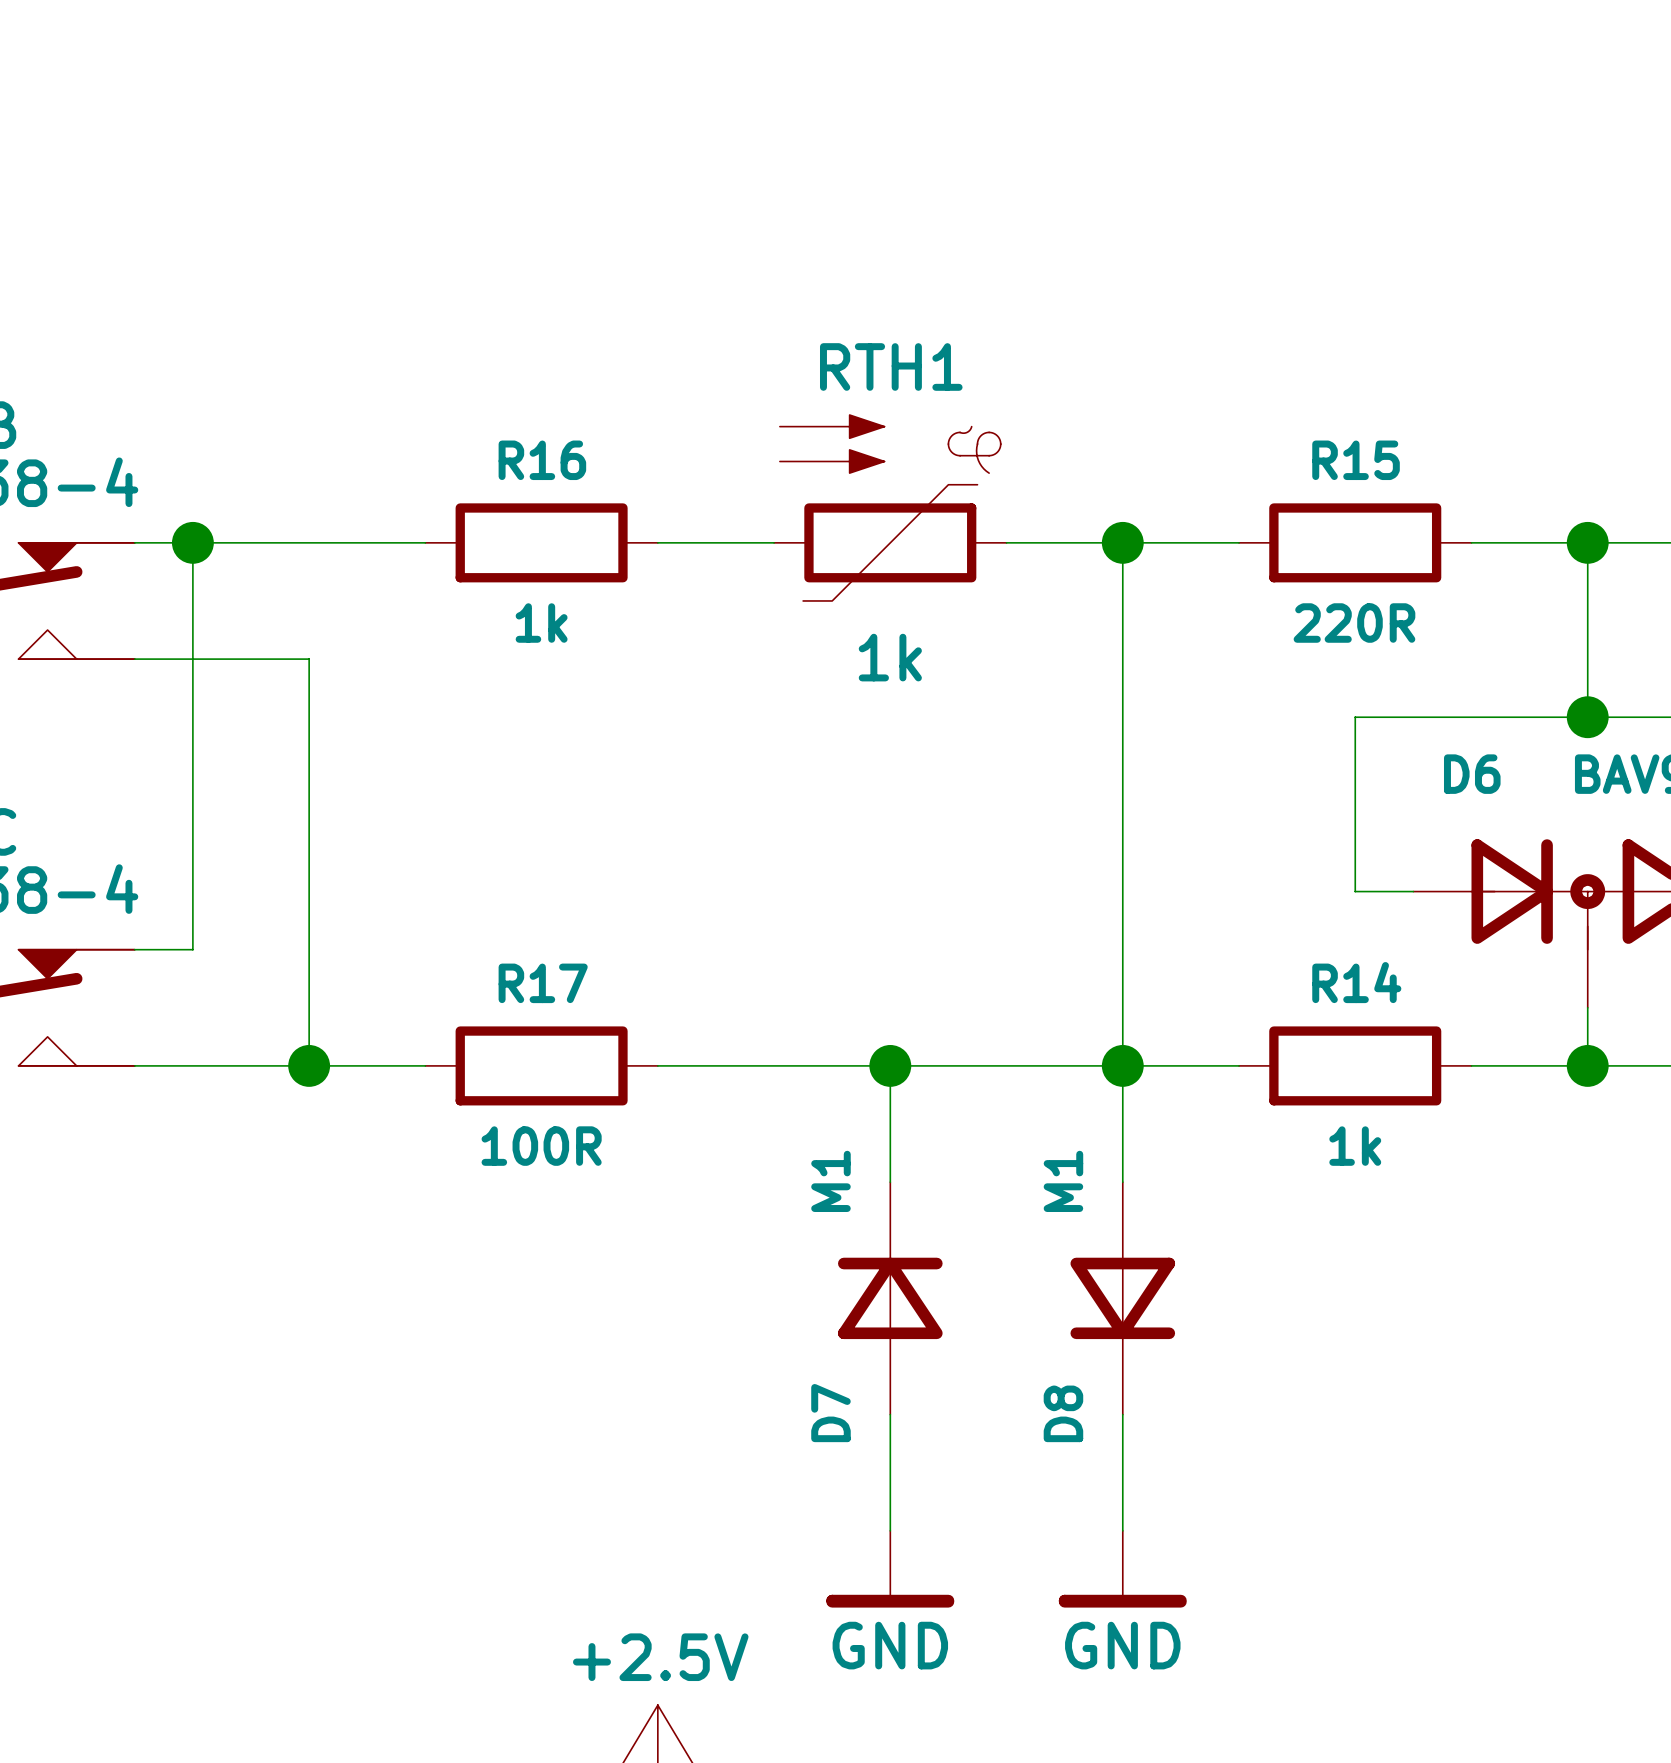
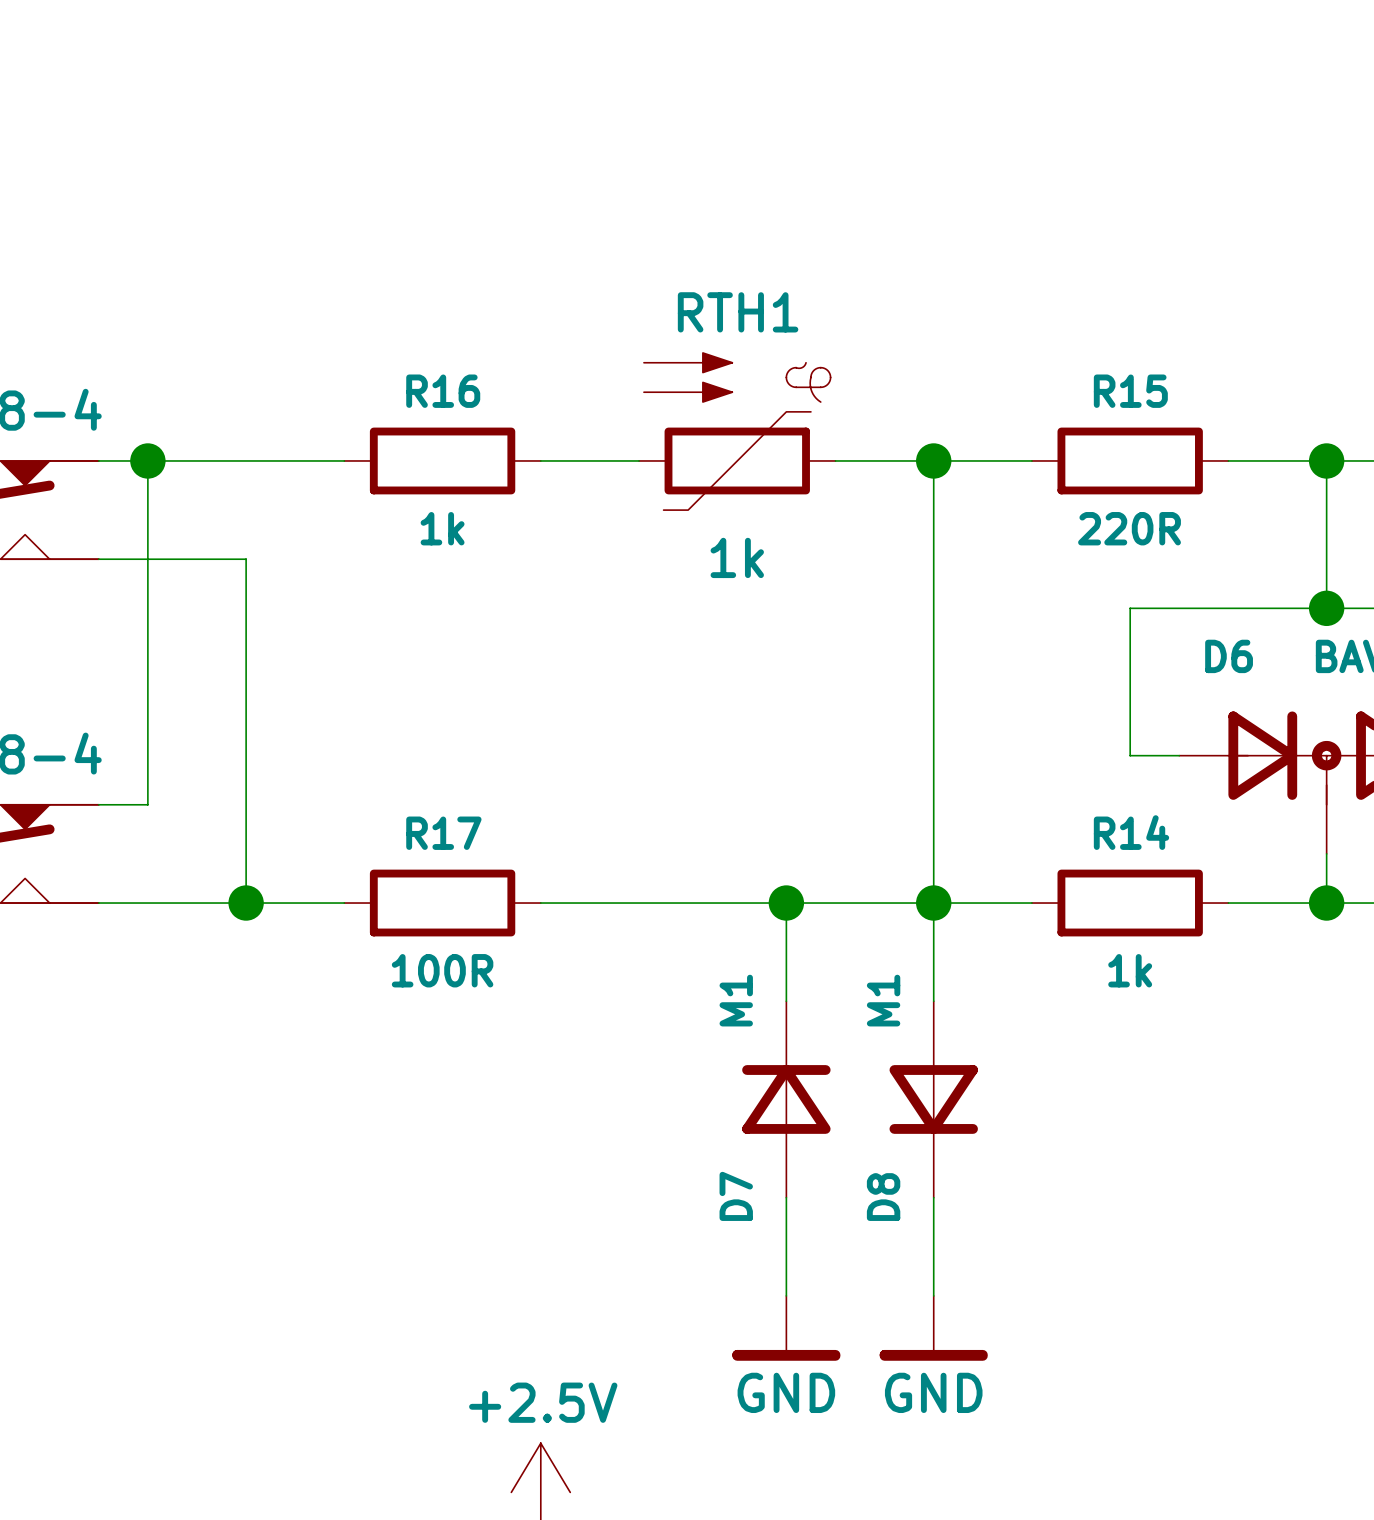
wire: (890, 1065) (890, 1182) -> (786, 903) (786, 1001)
junction position: (890, 1065) -> (786, 903)
D7 position: (890, 1298) -> (786, 1099)
wire: (890, 1414) (890, 1530) -> (786, 1197) (786, 1295)
power symbol position: GND (890, 1569) -> GND (786, 1328)

